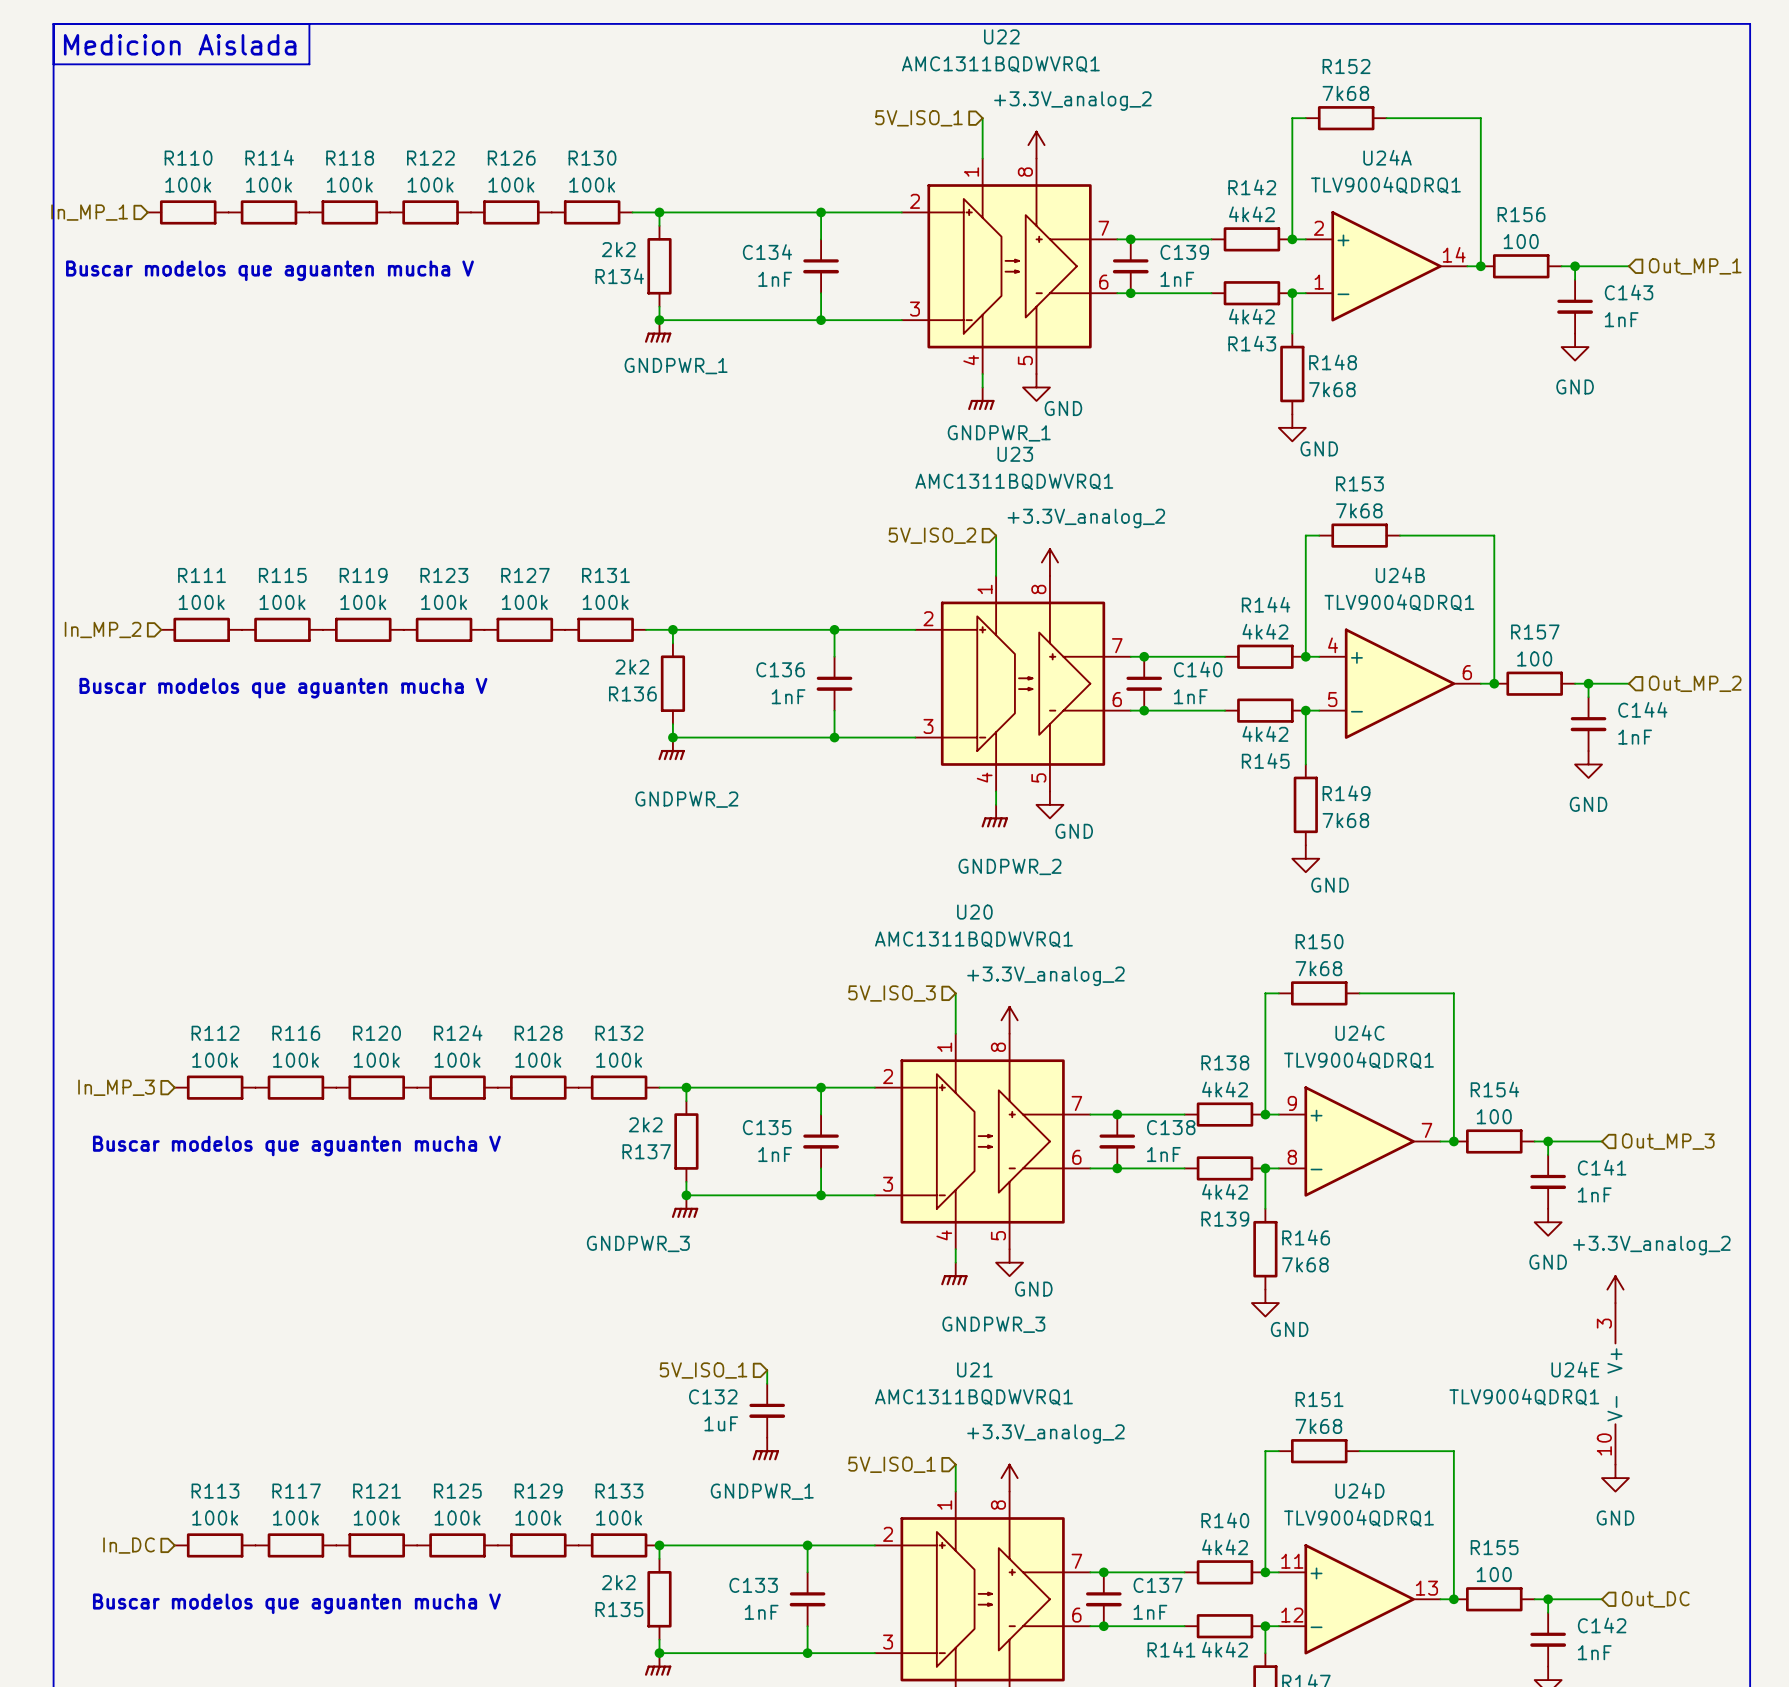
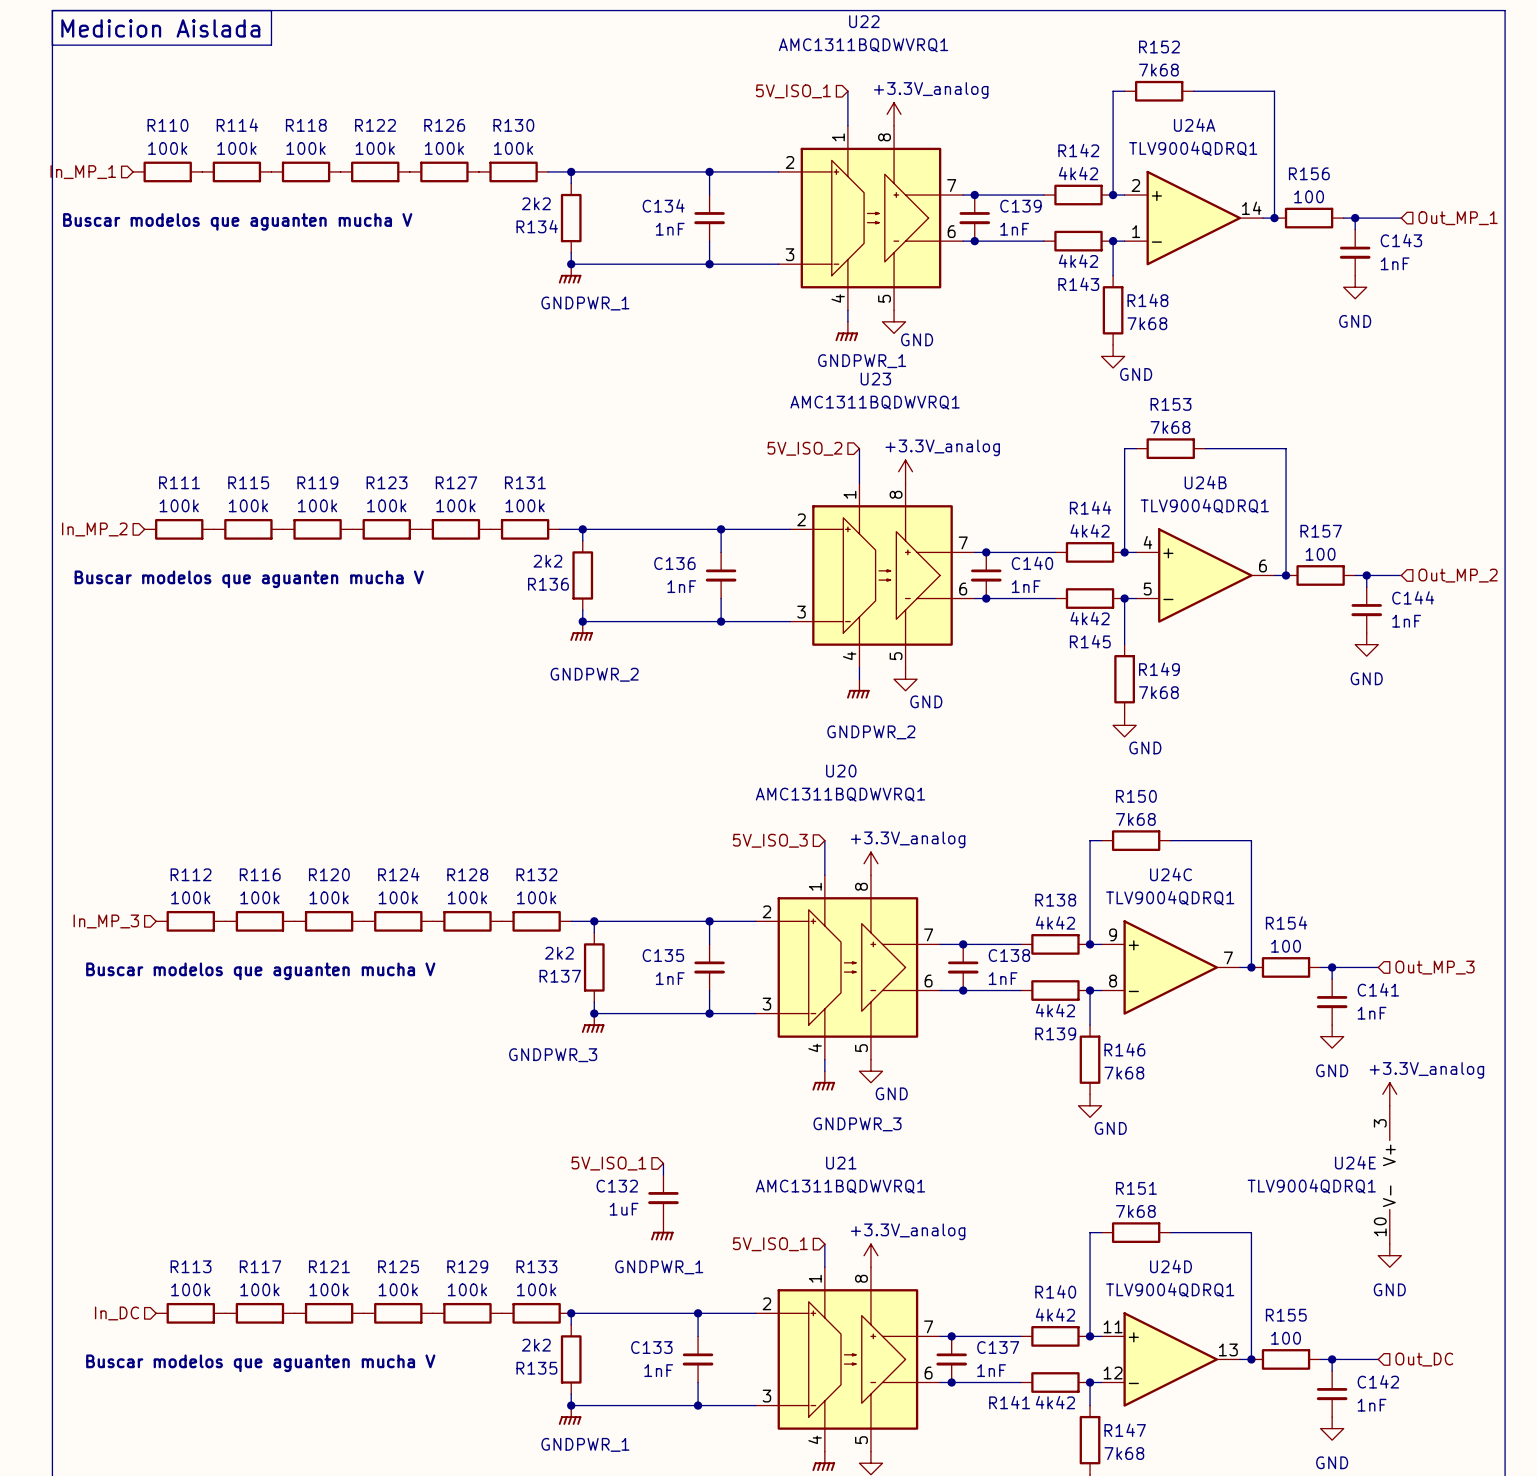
power symbol: +3.3V_analog_2 (1036, 145) -> +3.3V_analog (894, 114)
power symbol: +3.3V_analog_2 (1049, 562) -> +3.3V_analog (905, 471)
power symbol: +3.3V_analog_2 (1009, 1020) -> +3.3V_analog (870, 863)
power symbol: +3.3V_analog_2 (1615, 1289) -> +3.3V_analog (1389, 1094)
power symbol: +3.3V_analog_2 (1009, 1478) -> +3.3V_analog (870, 1255)

